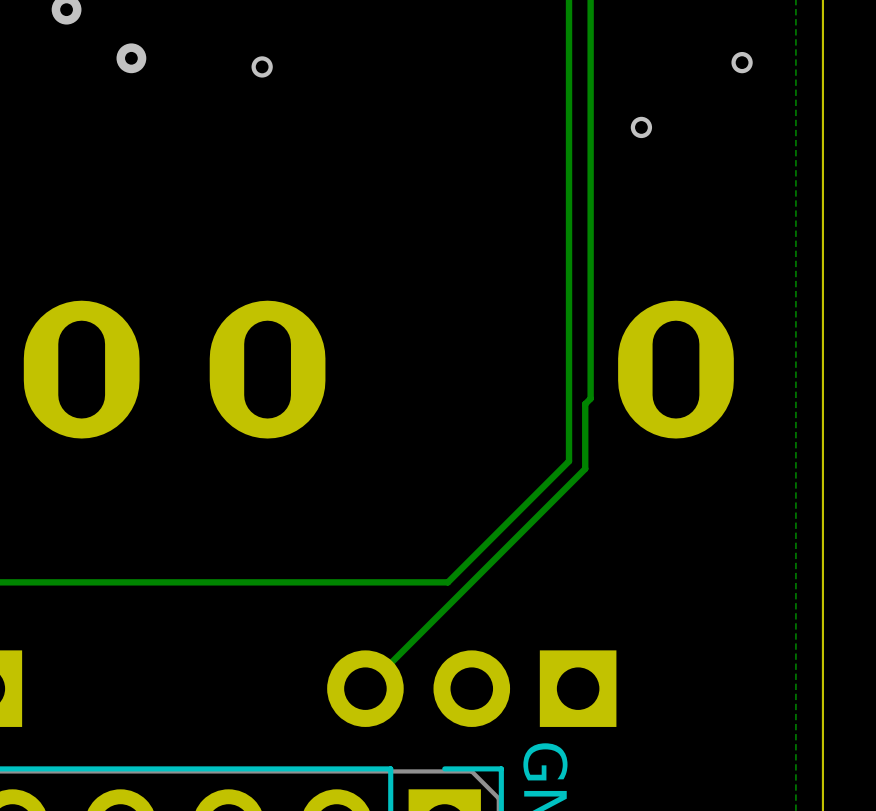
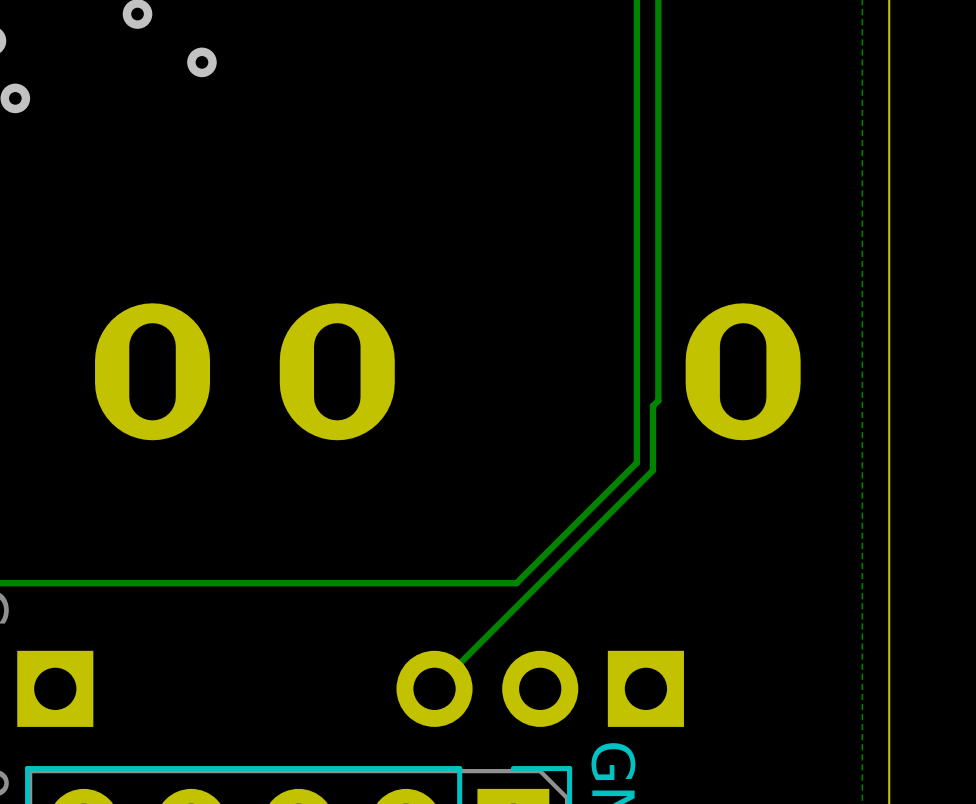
via: (742, 62) -> none
via: (262, 66) -> none
via: (641, 127) -> none

